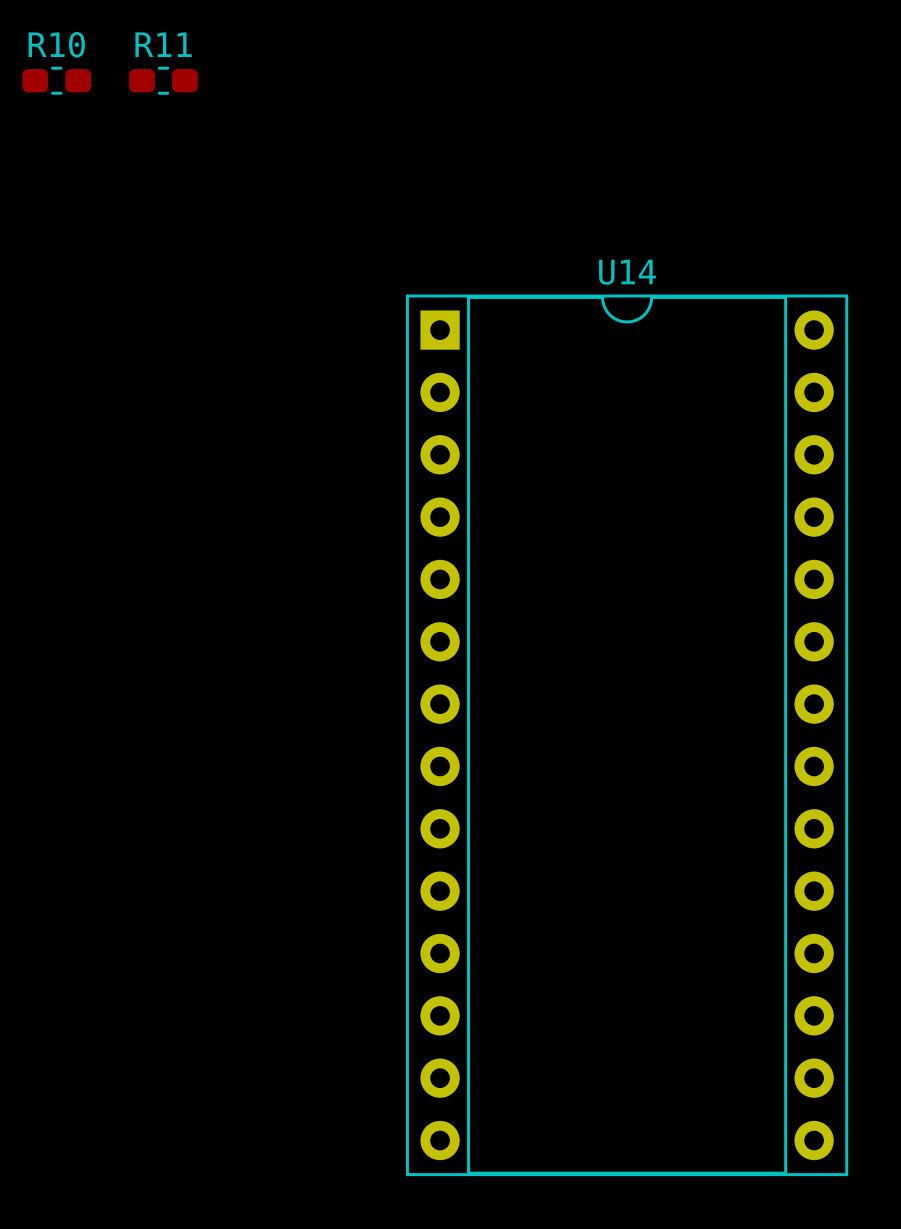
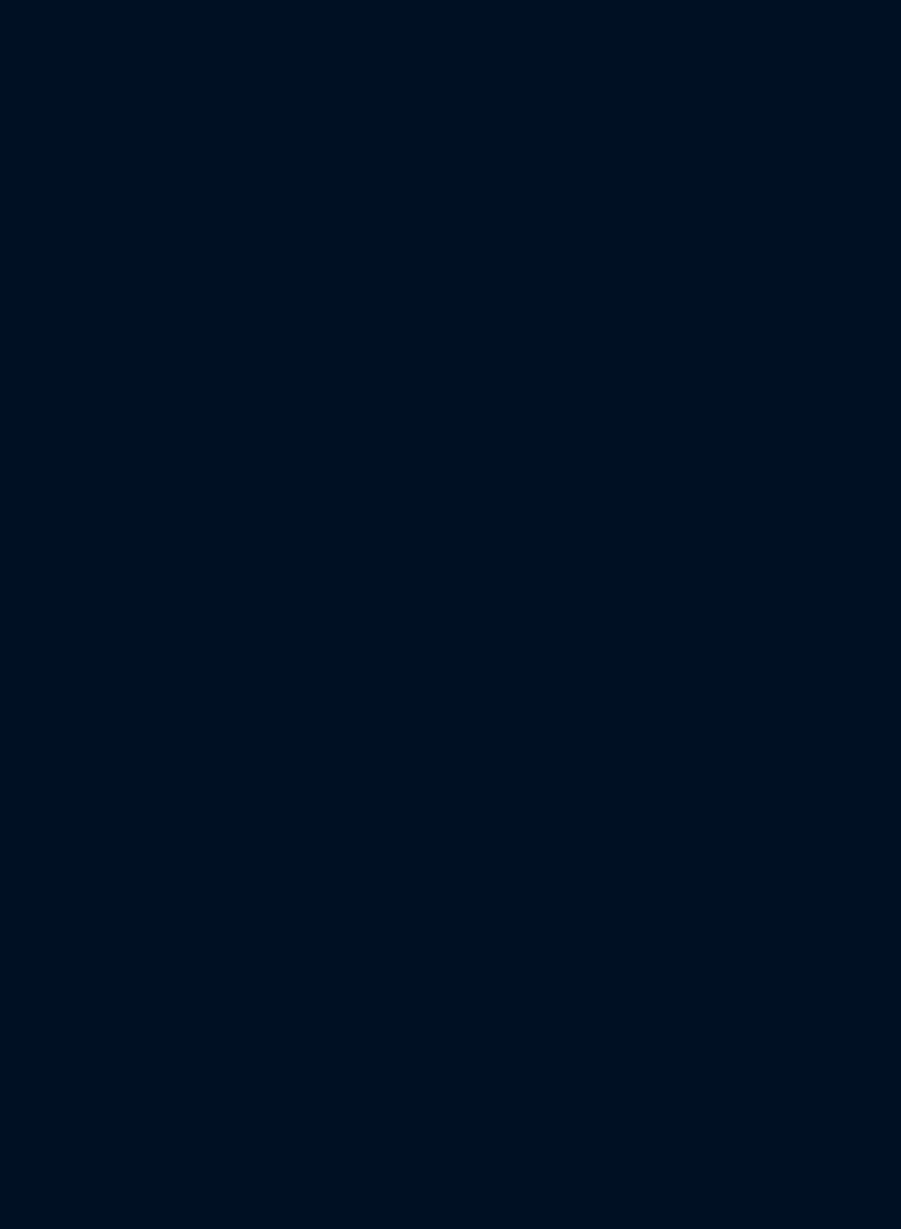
R10: (56, 80) -> none
R11: (163, 80) -> none
U14: (627, 735) -> none

